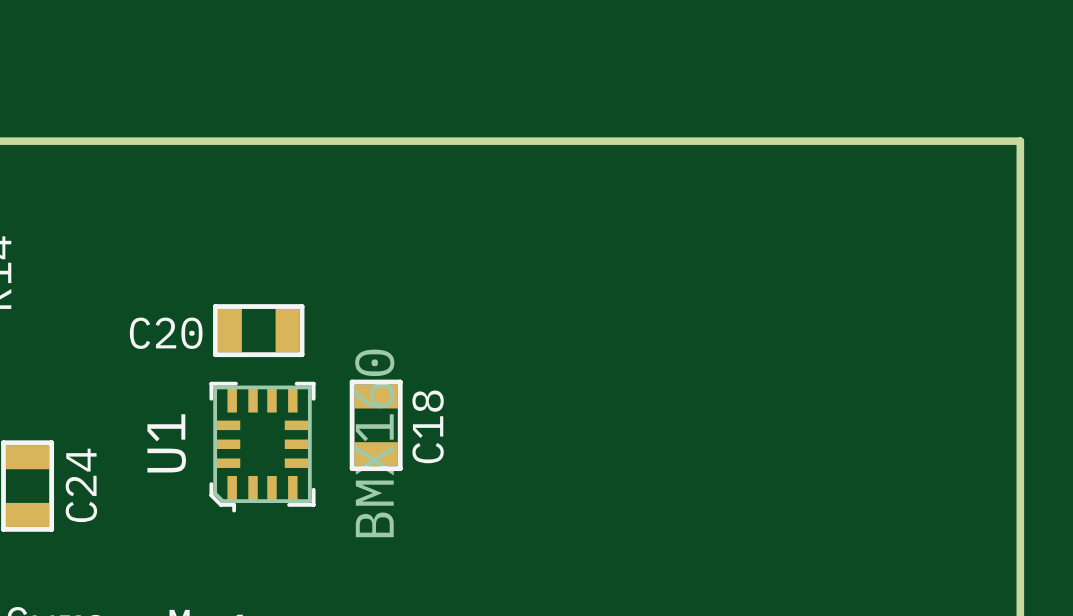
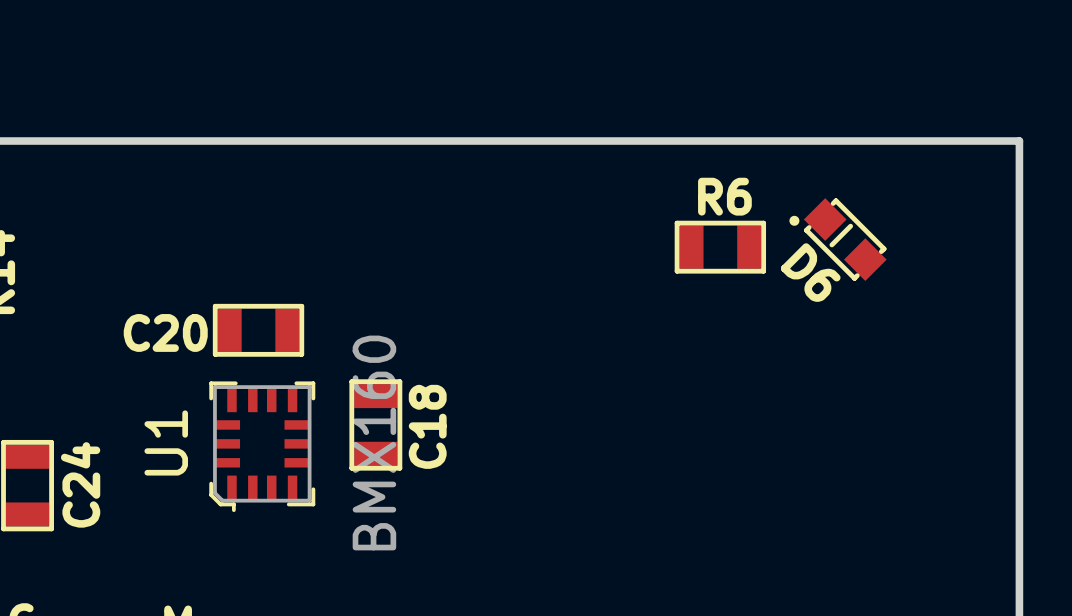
D6: none -> (838, 239)
R6: none -> (720, 247)

